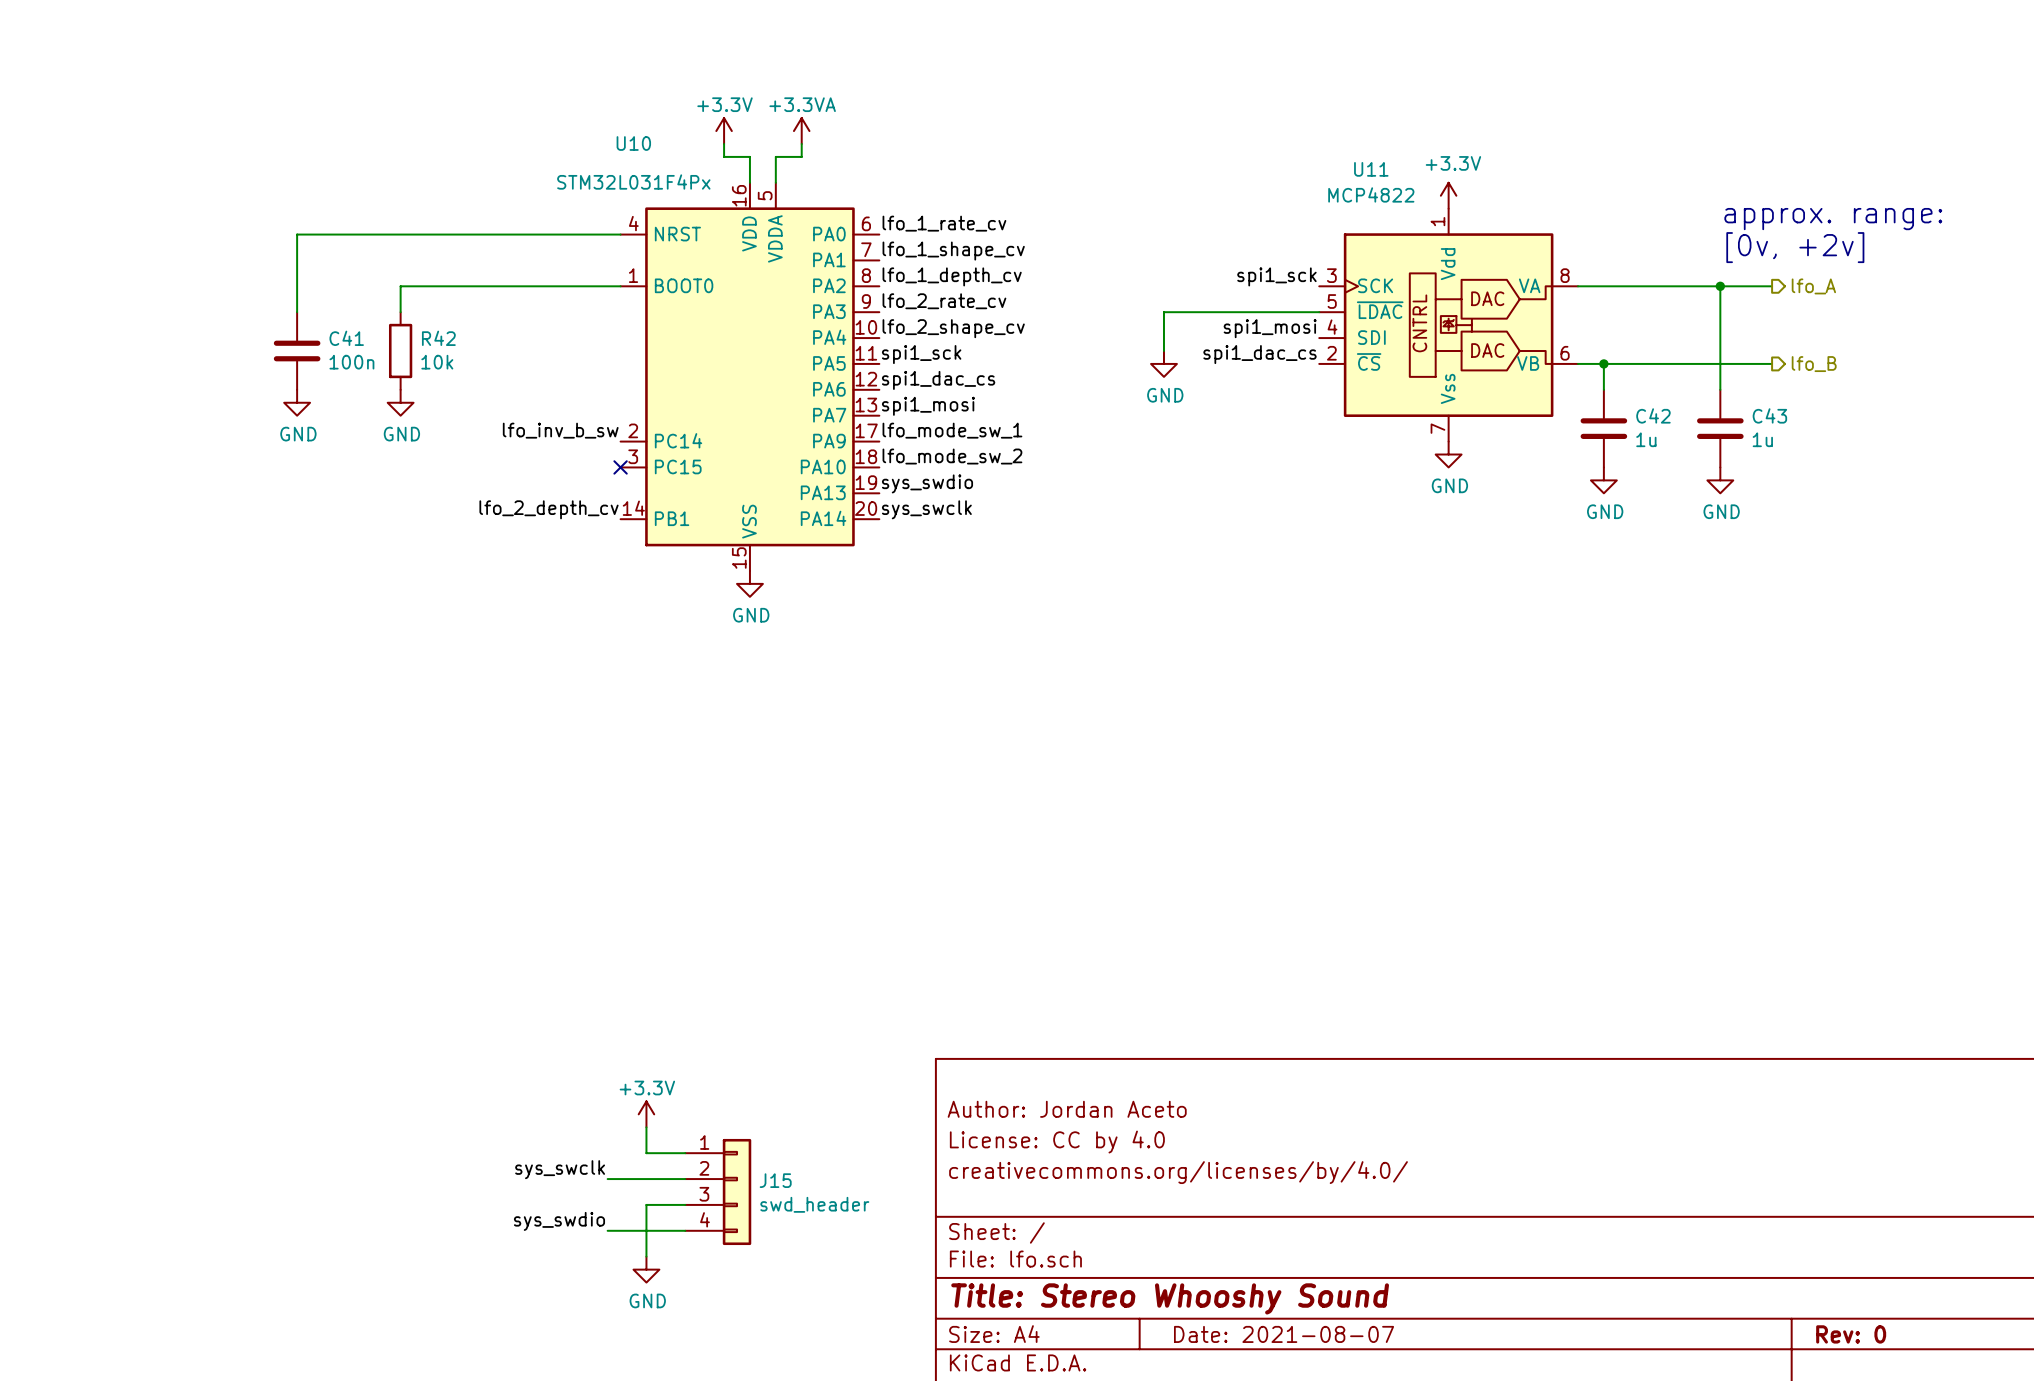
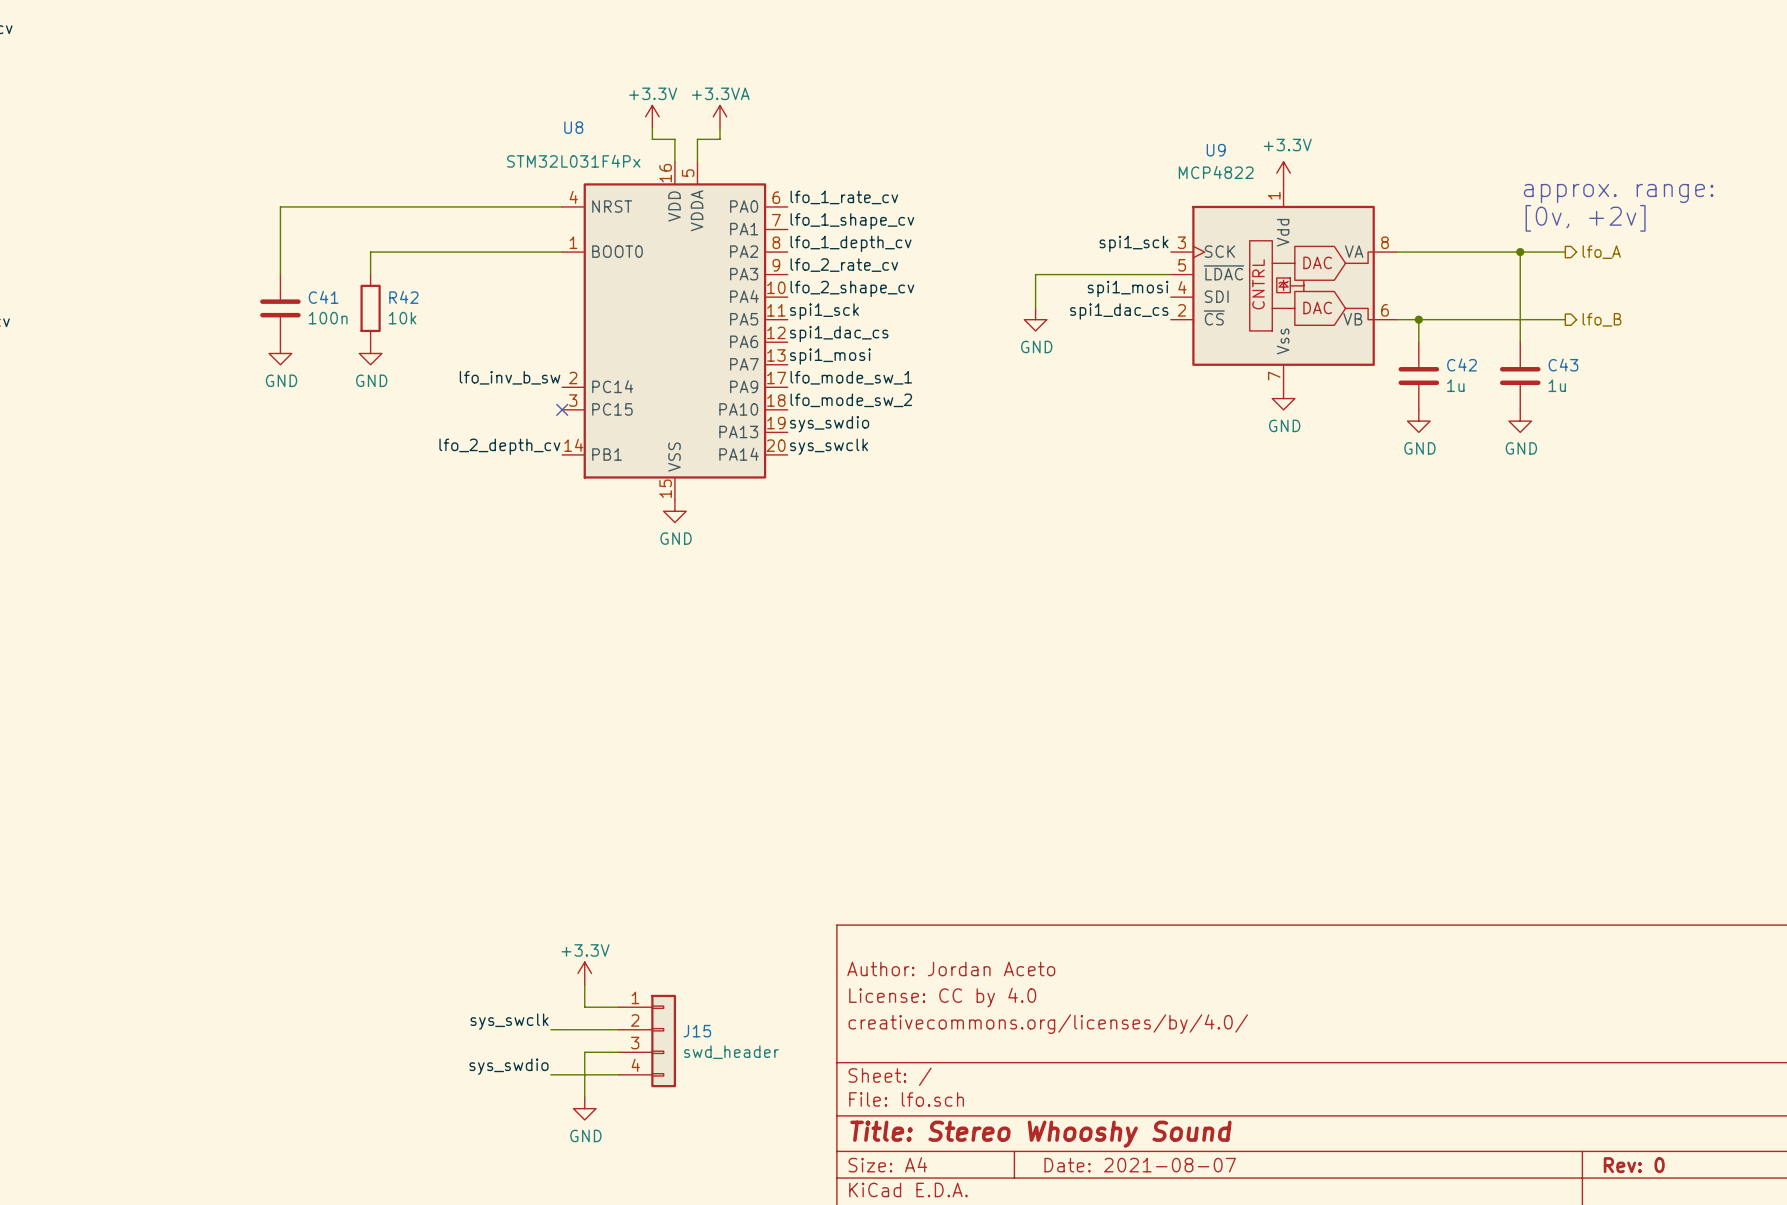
U10 name: U10 (633, 143) -> U8 (573, 127)
U11 name: U11 (1371, 169) -> U9 (1216, 150)

